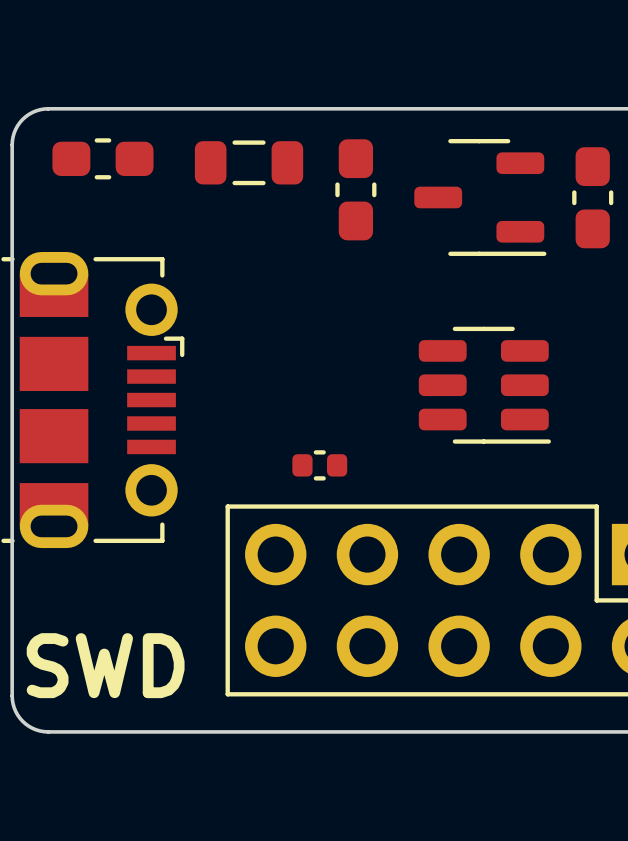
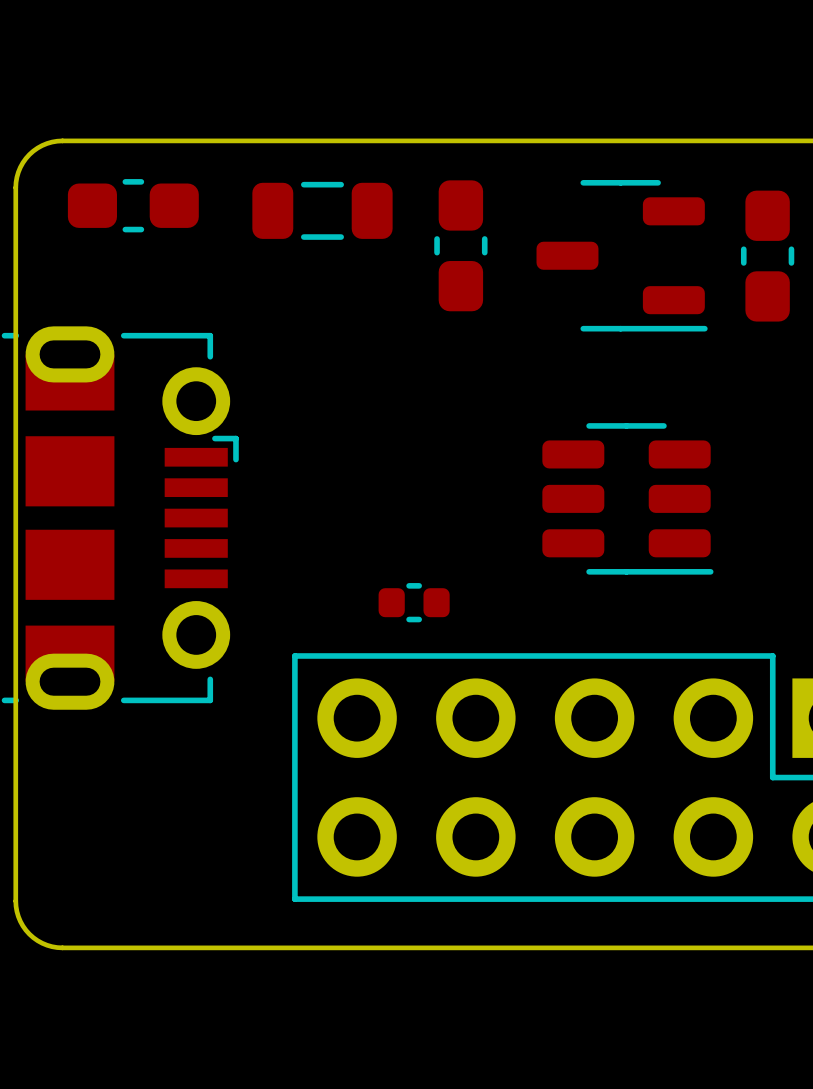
text: SWD (105, 665) -> none

